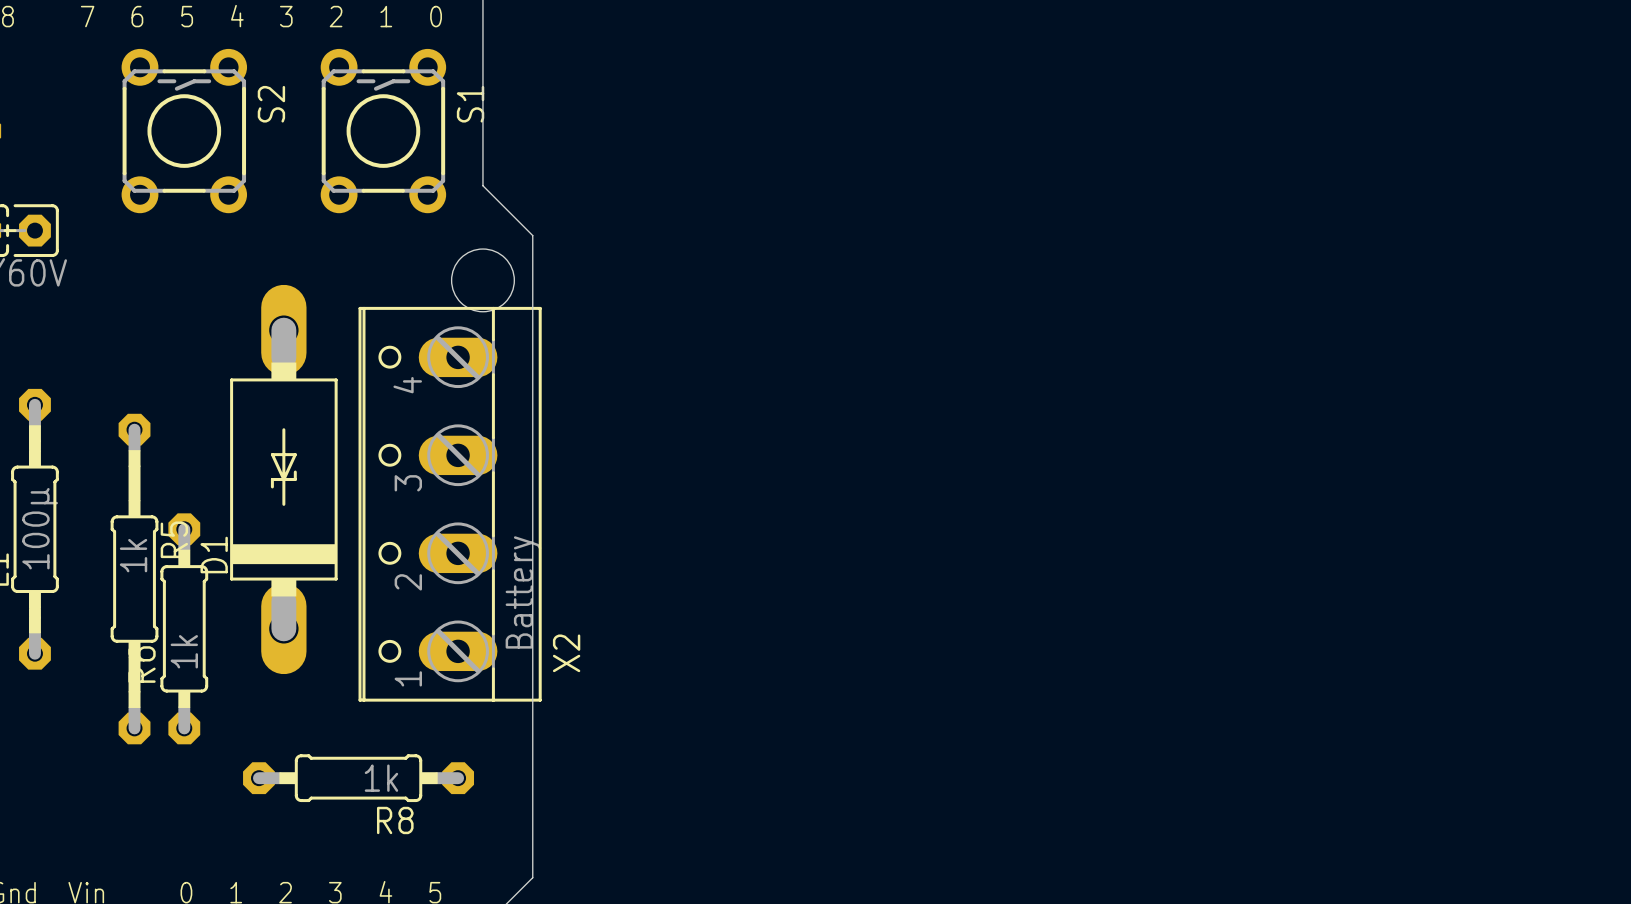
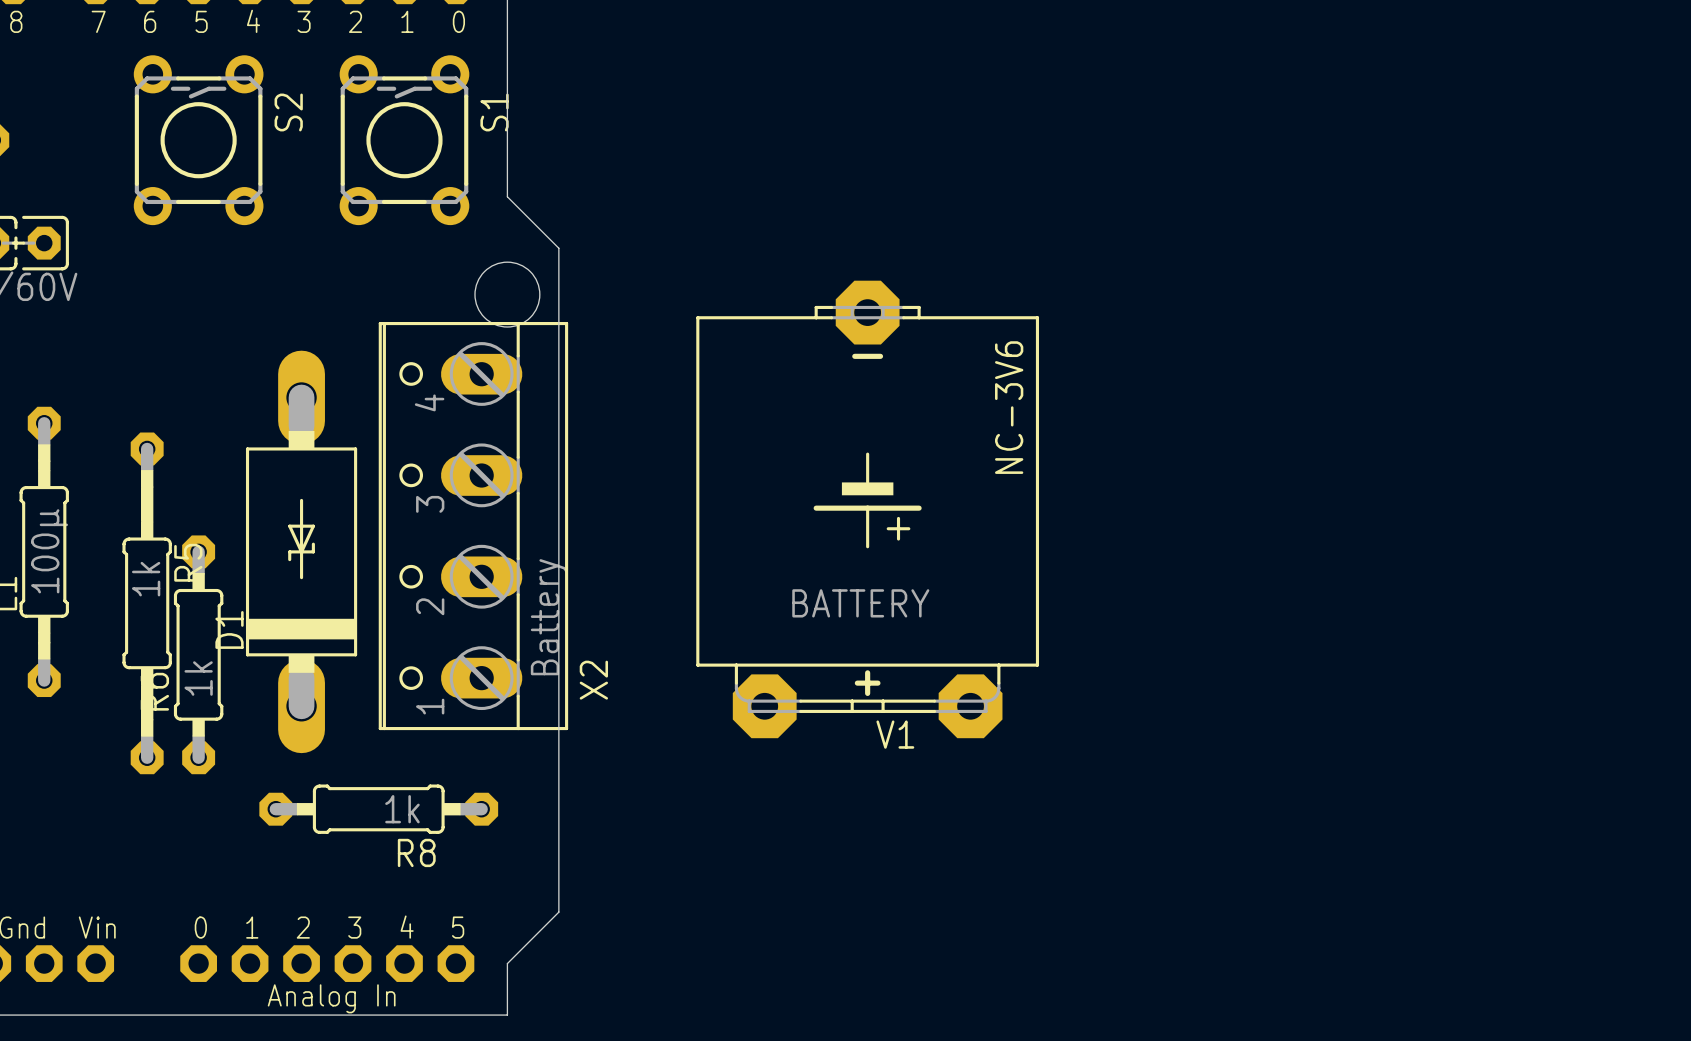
D1 position: (283, 479) -> (301, 551)
V1: none -> BATTERY (867, 509)

